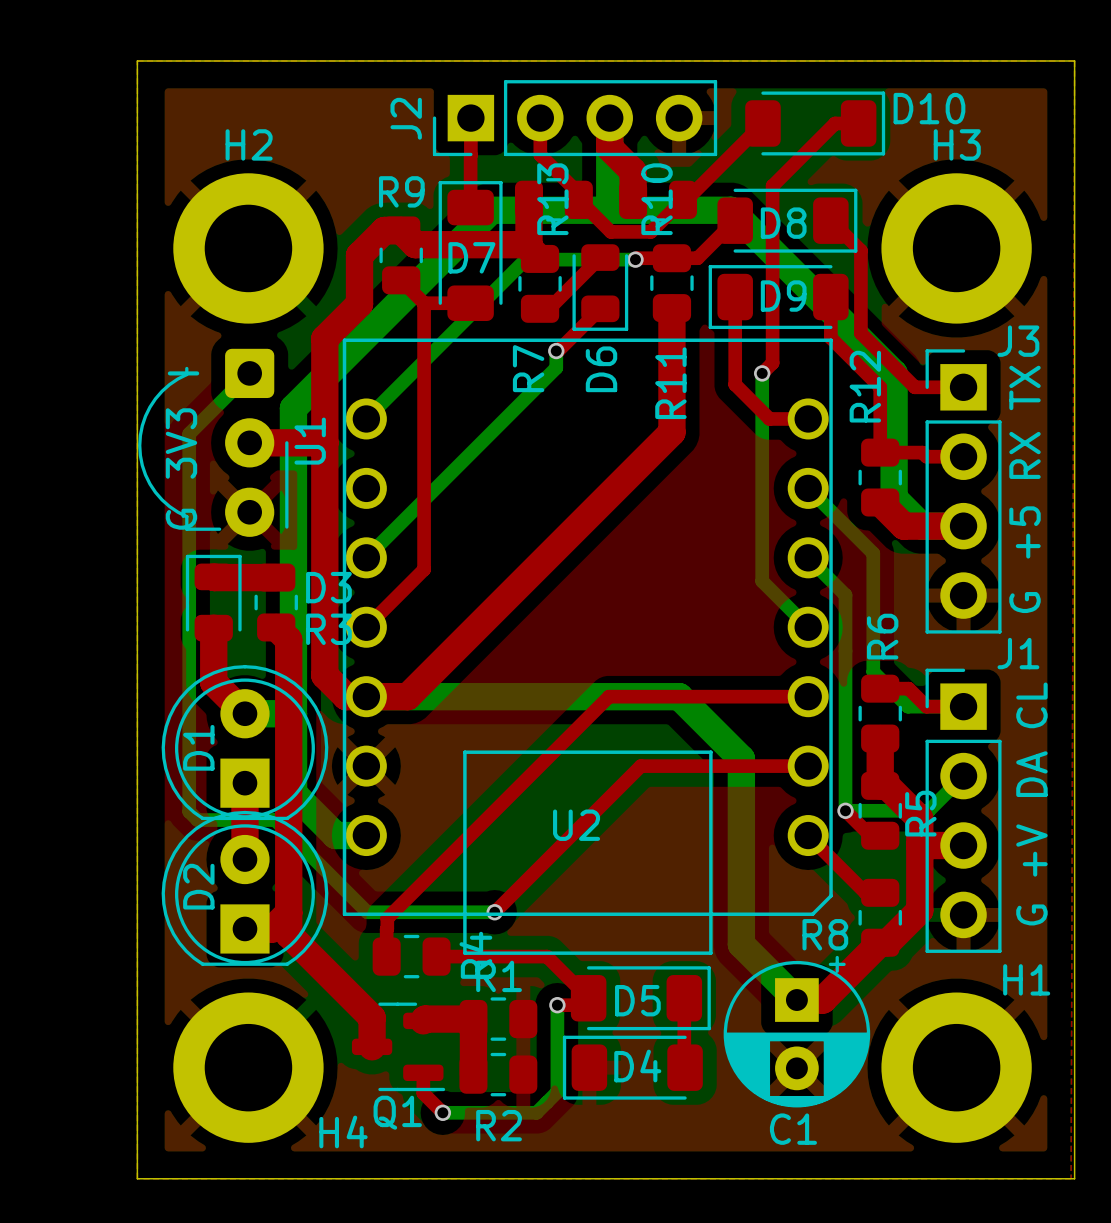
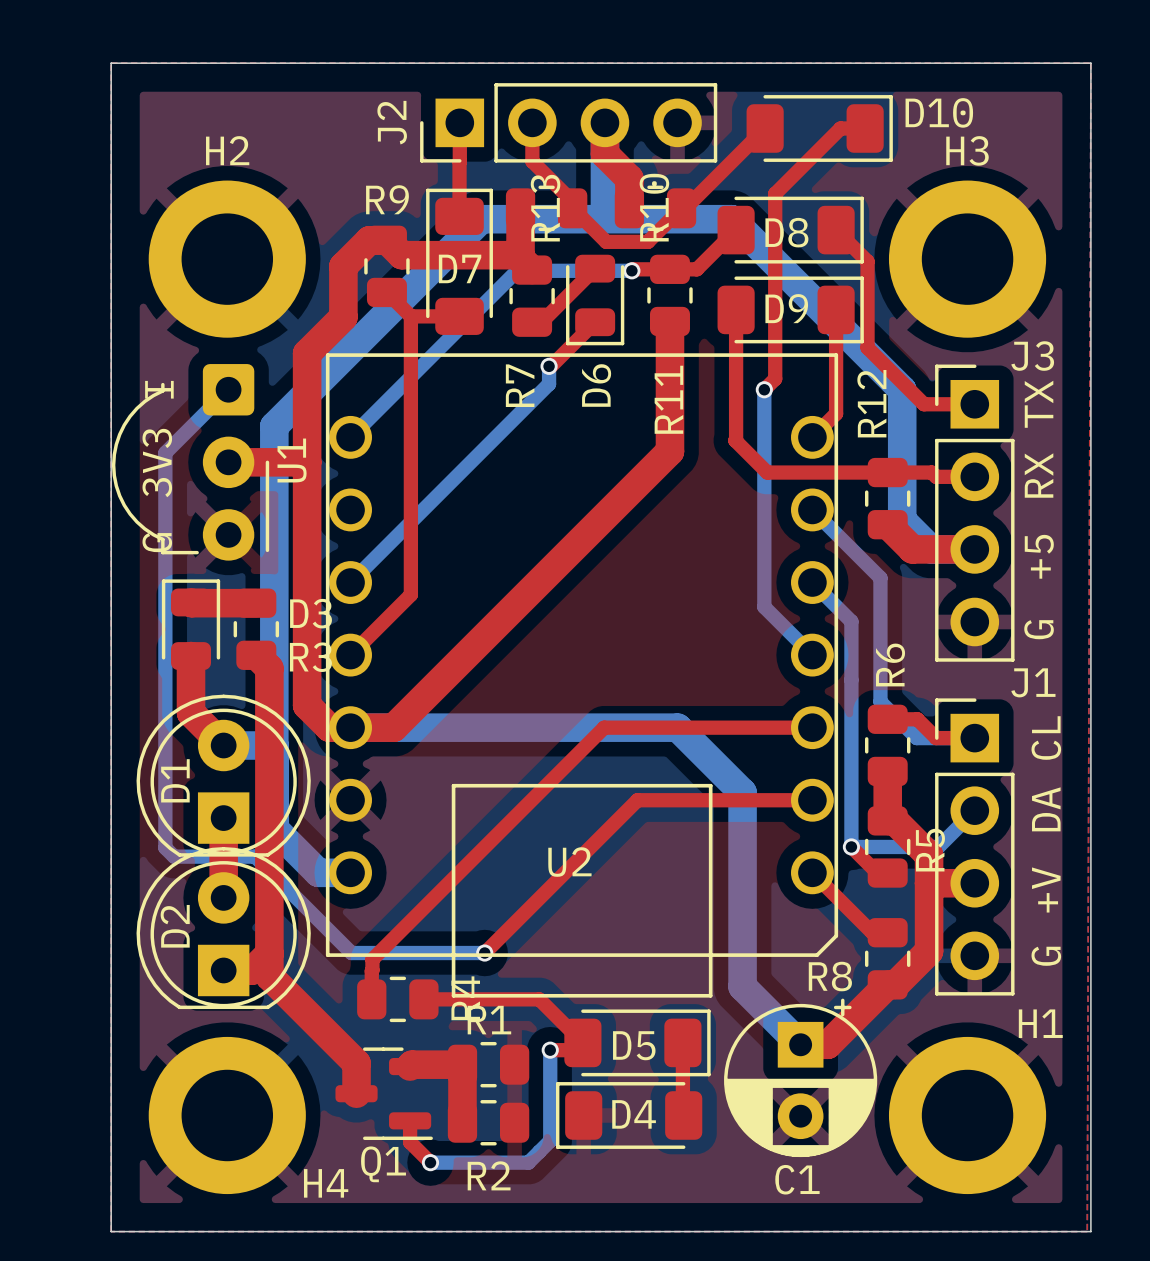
D9 rotation: 0° (778, 297) -> 180° (790, 309)
top track: (830, 337) (880, 387) (880, 452) -> (836, 352) (836, 413) (812, 437)
top track: (735, 384) (769, 418) (808, 418) -> (736, 401) (735, 440) (767, 472) (887, 472)

